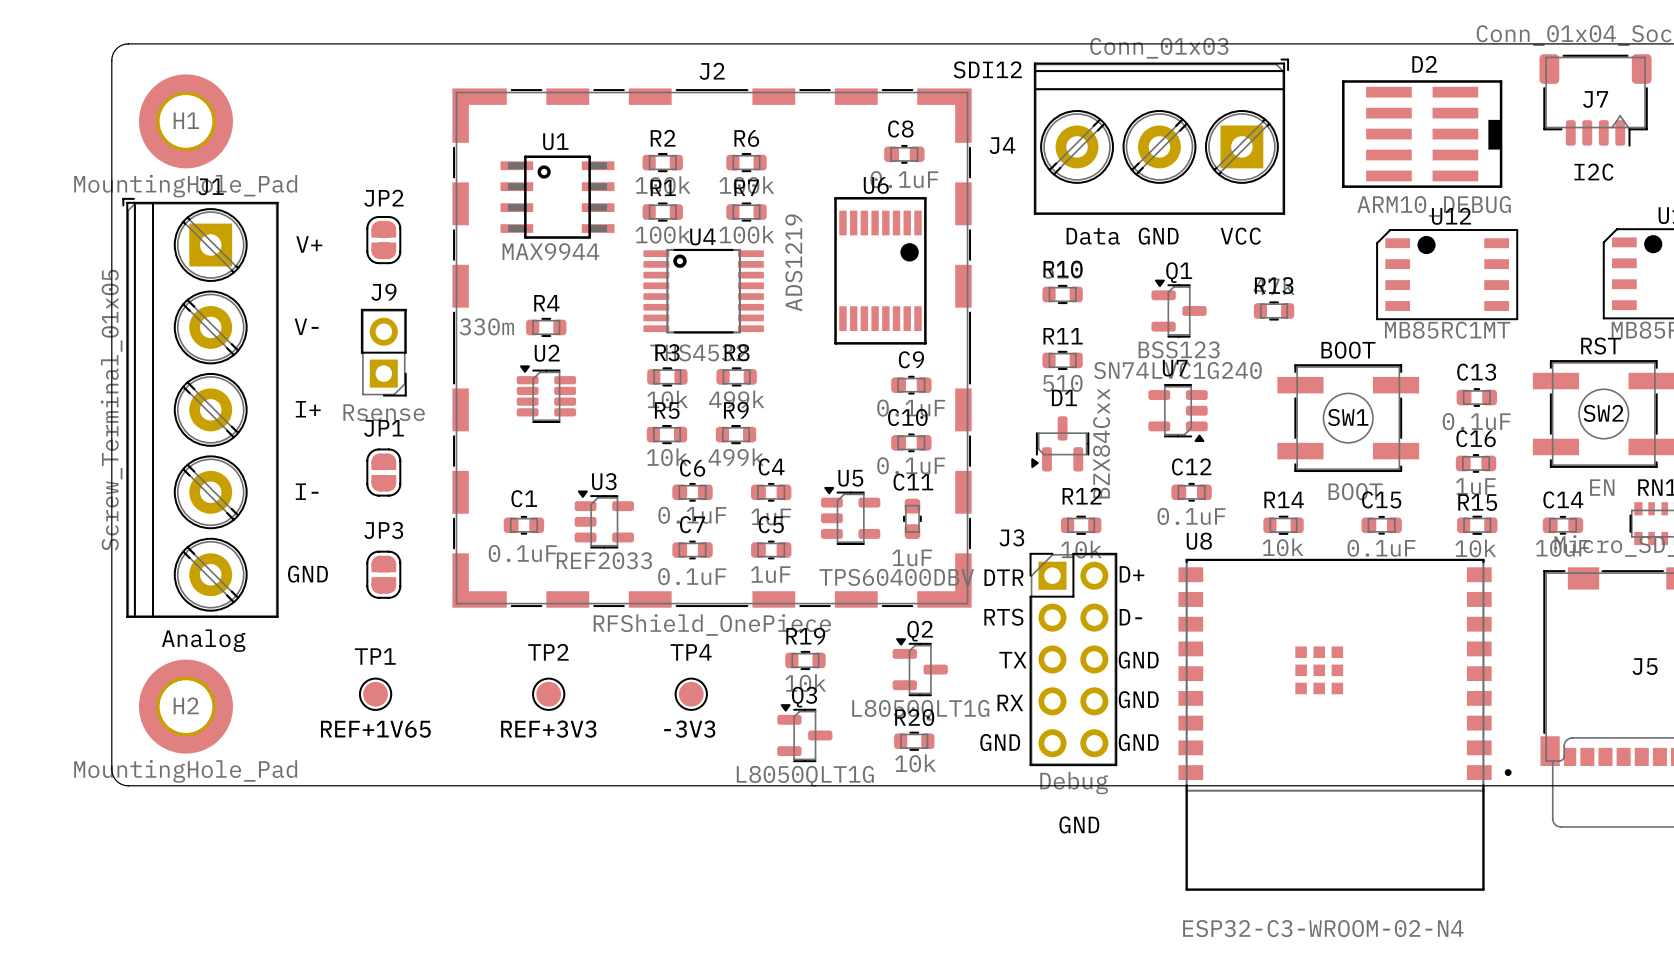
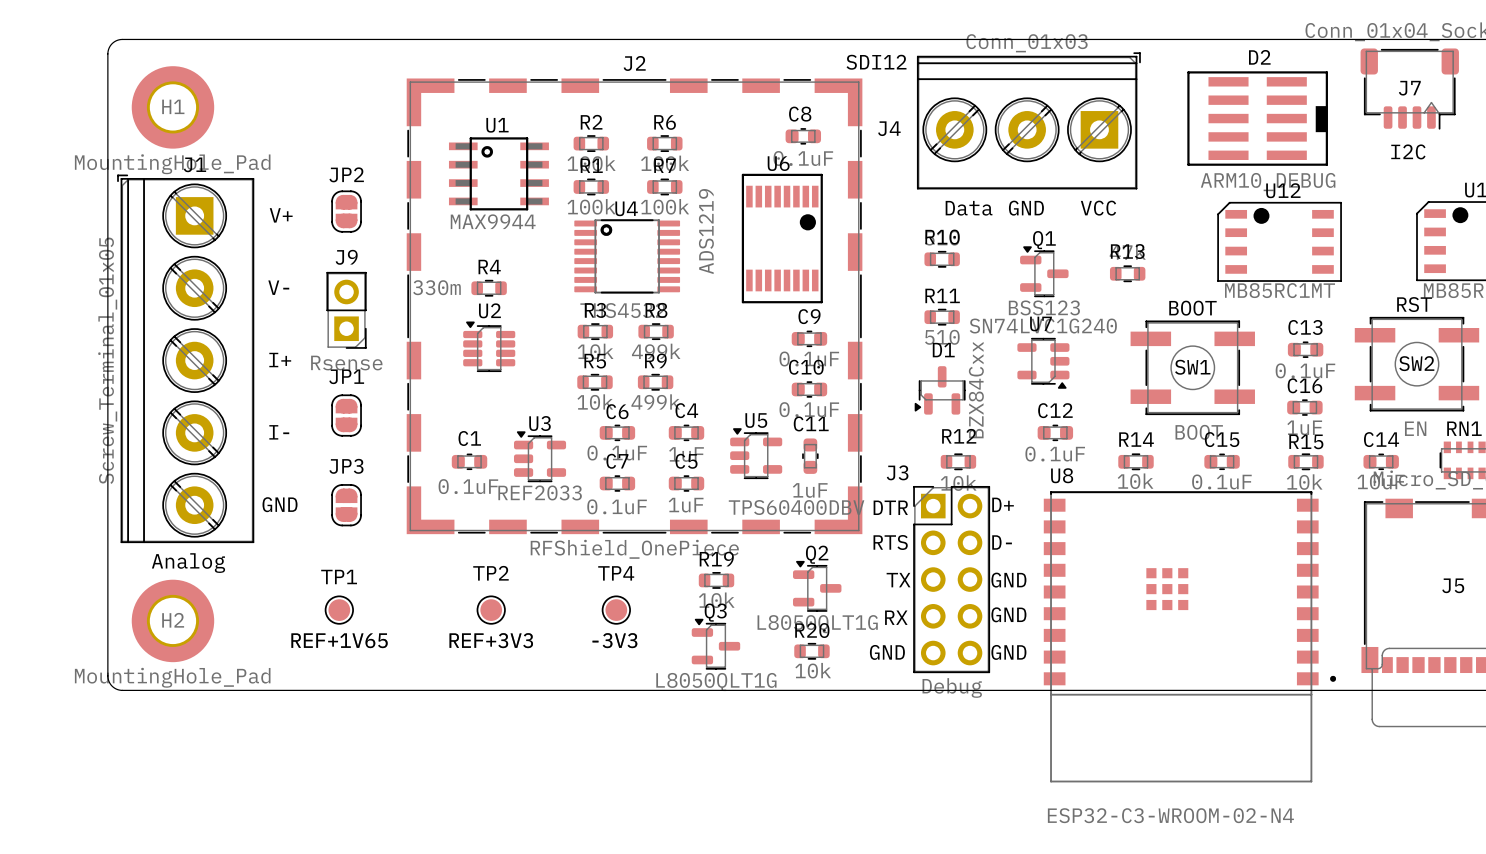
U8 footprint: [1178, 558, 1512, 891] -> [1043, 491, 1336, 783]
text: GND (1079, 824) -> none

